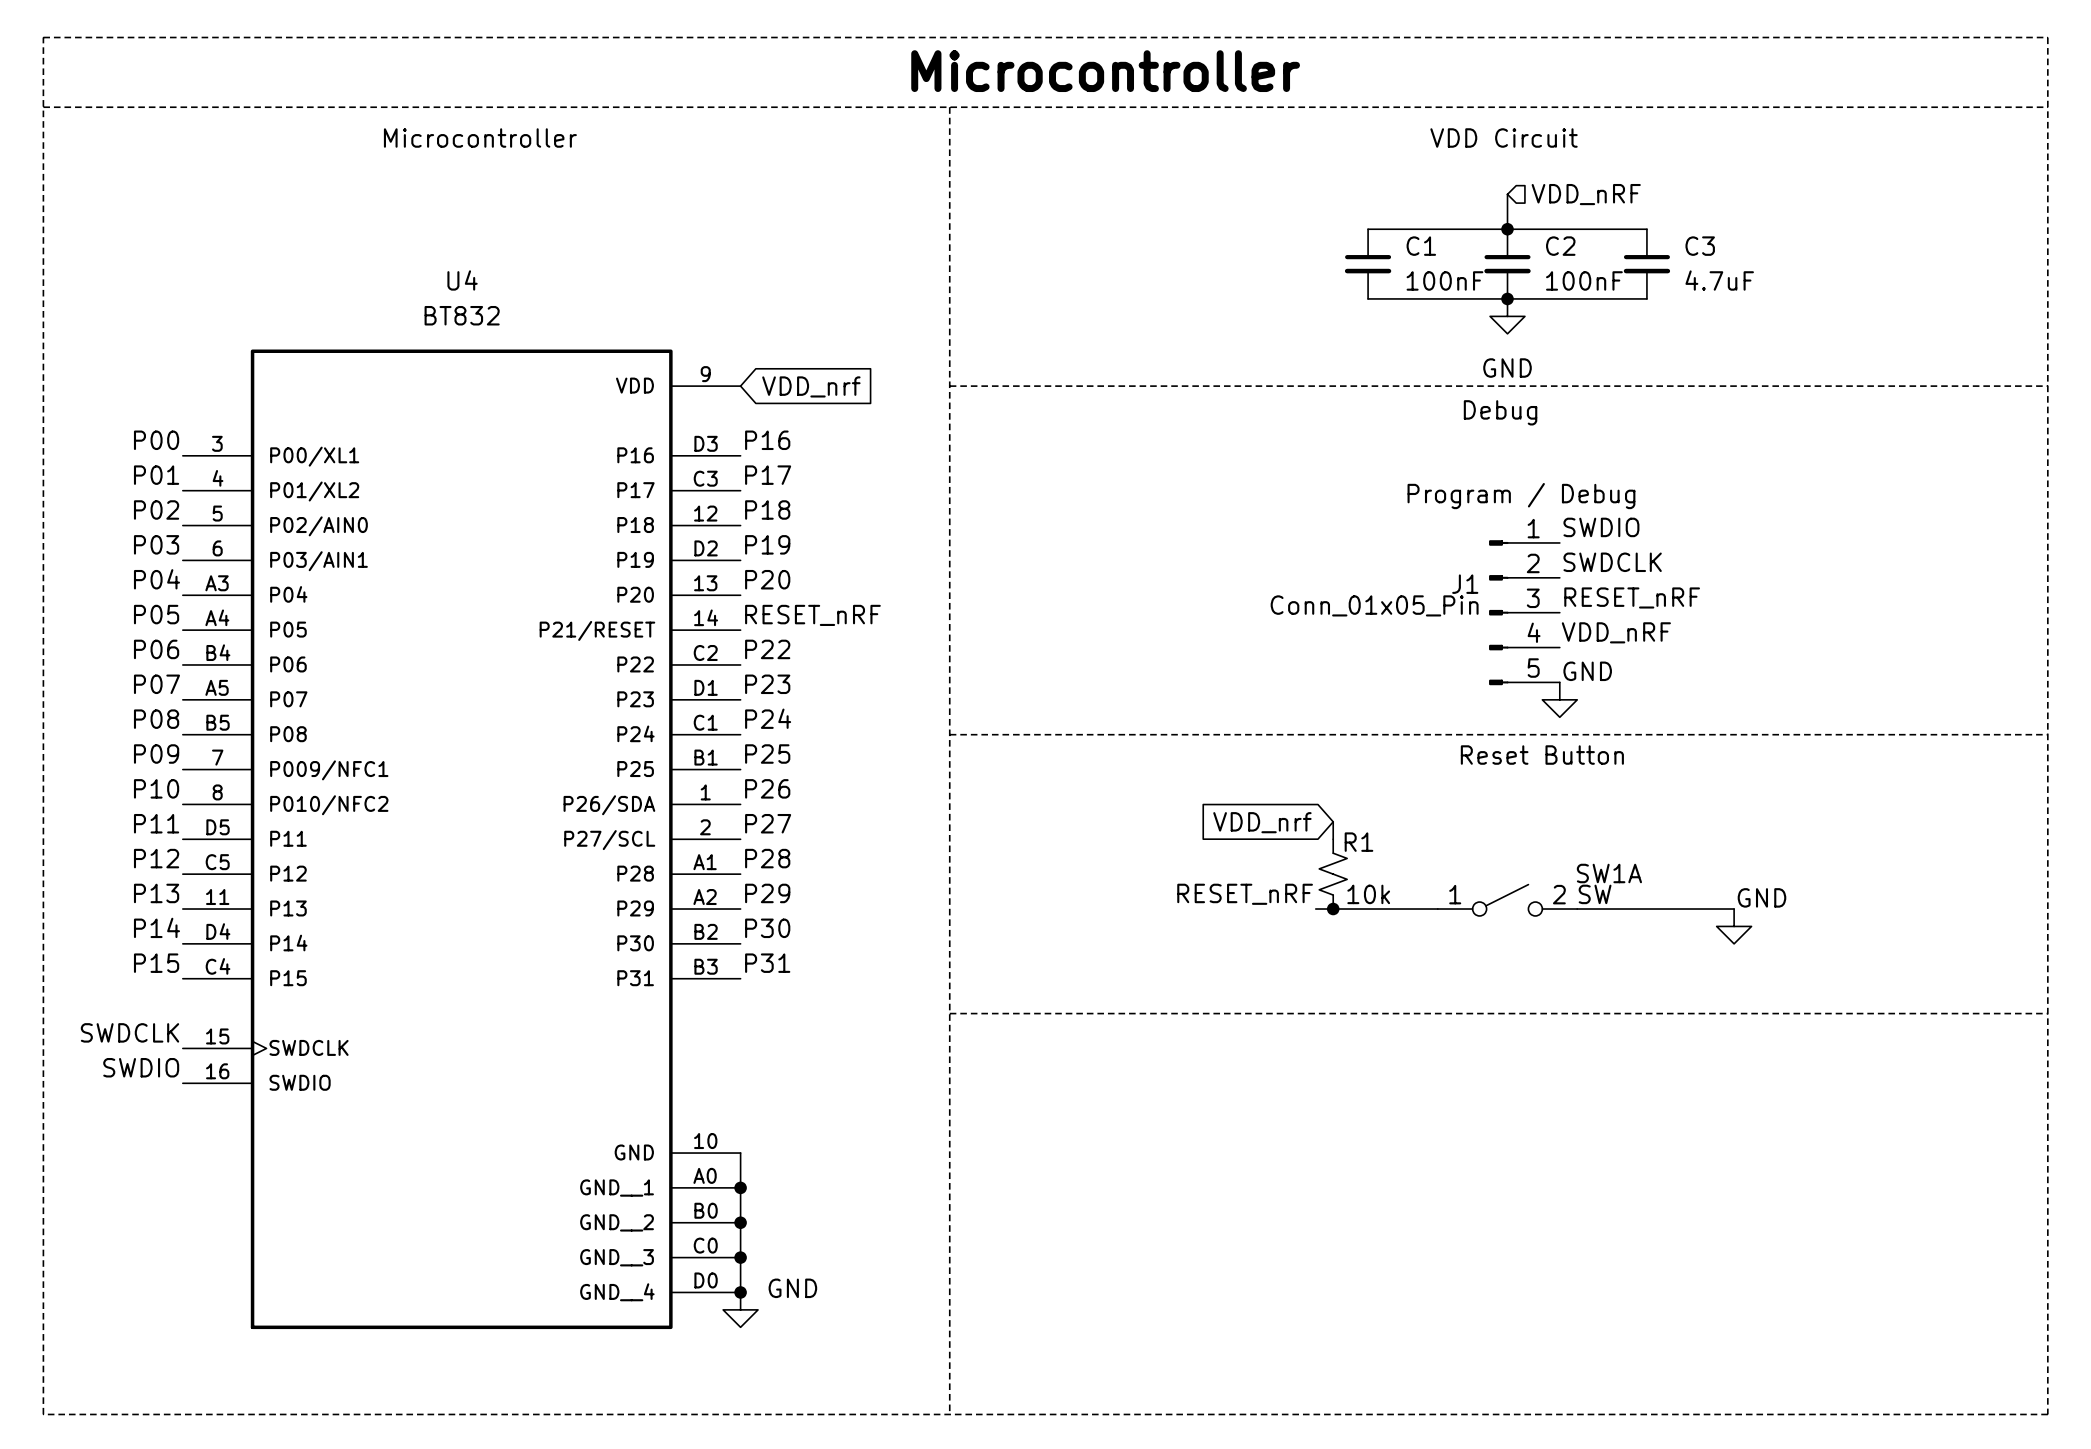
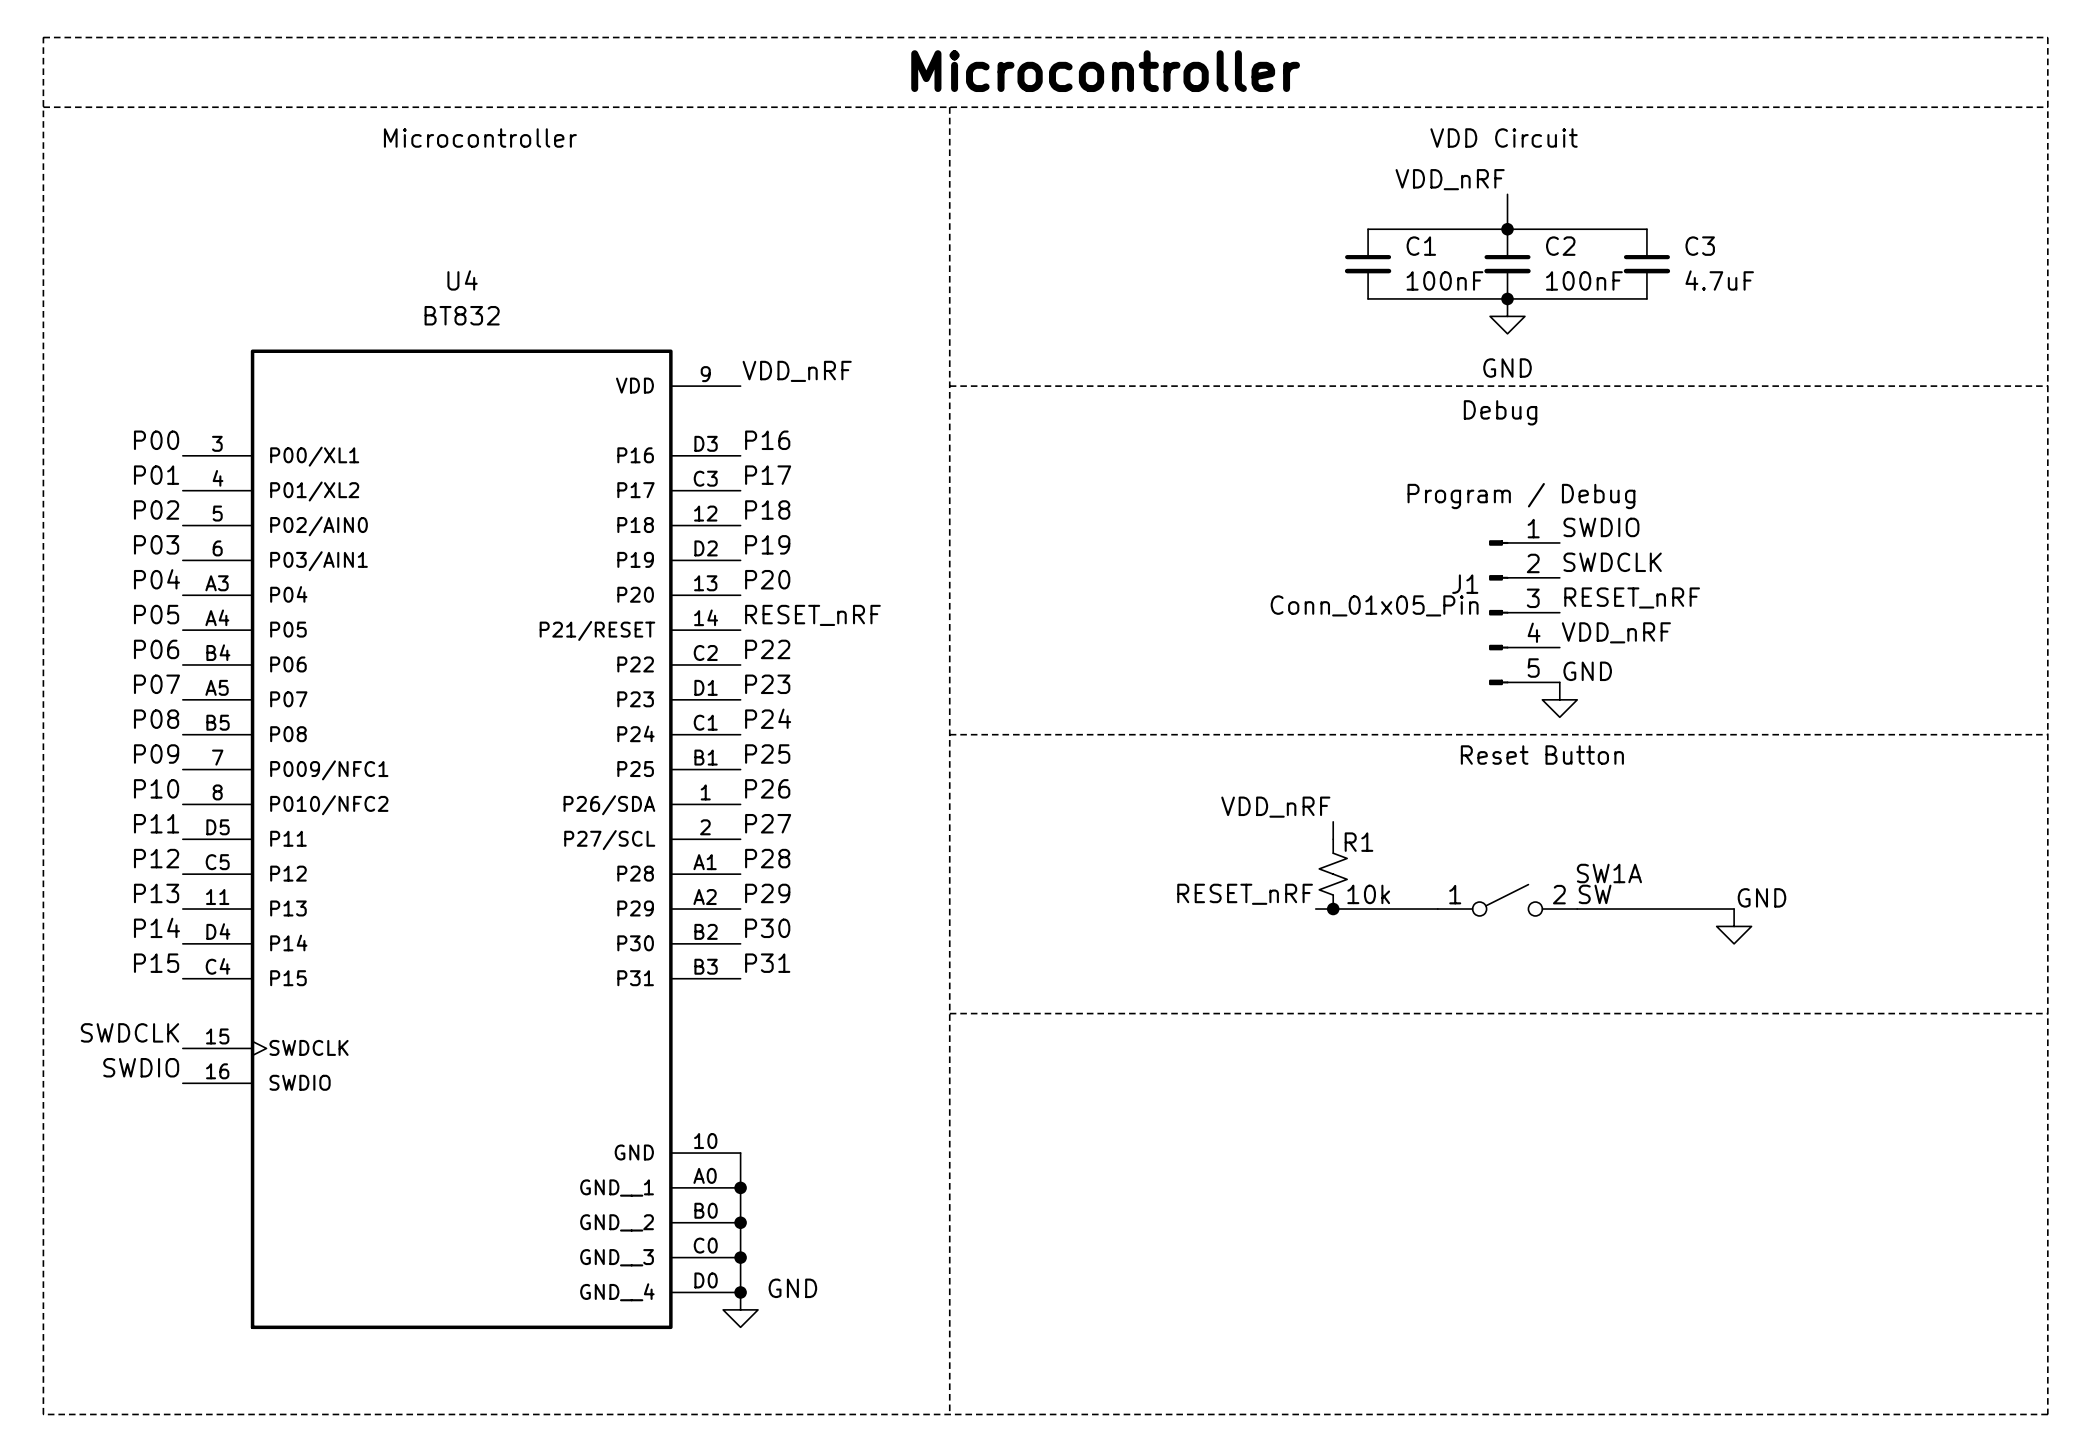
label: none -> VDD_nRF (1450, 179)
hierarchical label: VDD_nRF (1586, 194) -> none
label: none -> VDD_nRF (797, 371)
global label: VDD_nrf (811, 386) -> none
label: none -> VDD_nRF (1275, 807)
global label: VDD_nrf (1262, 822) -> none

